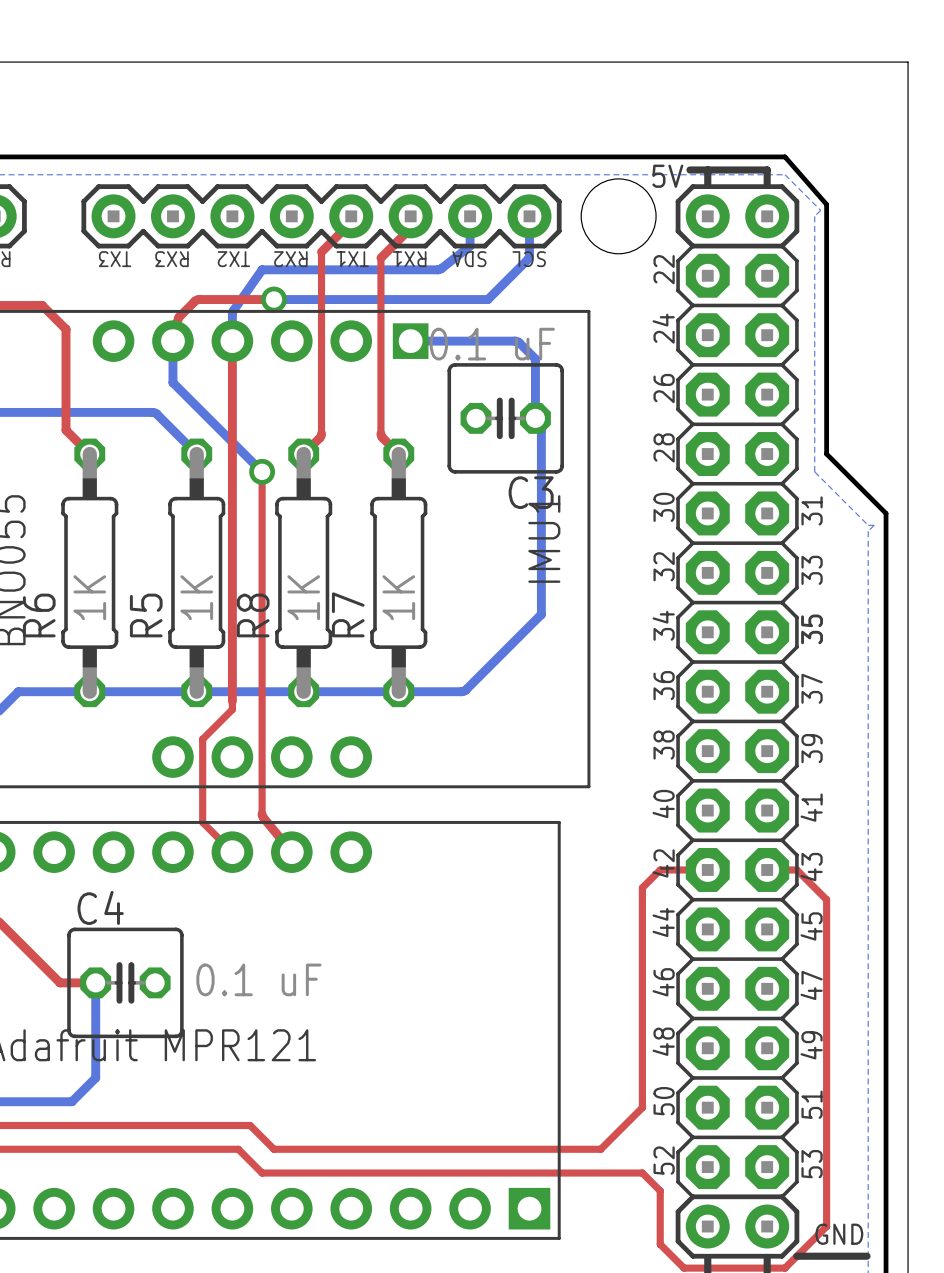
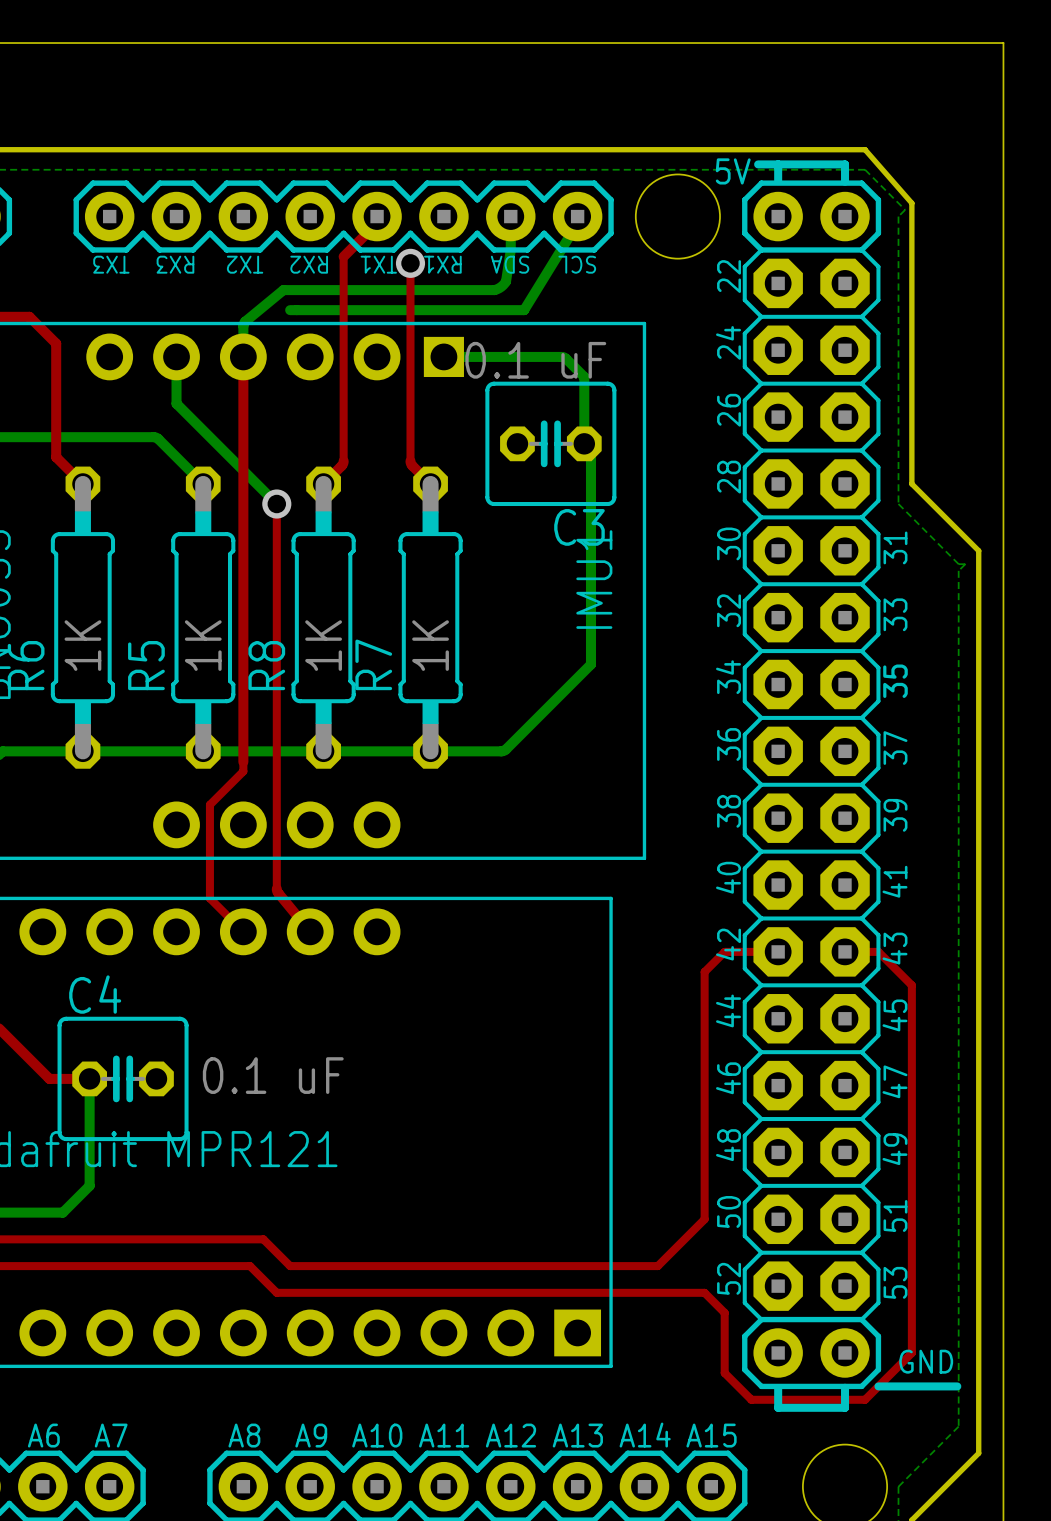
top track: (410, 216) (409, 229) (380, 257) -> none
bottom track: (529, 222) (528, 258) (487, 299) (481, 299) -> (577, 223) (524, 310)
bottom track: (470, 246) (438, 269) (262, 269) (234, 309) -> (510, 249) (506, 281) (494, 290) (283, 290) (245, 321)
top track: (273, 299) (196, 299) (178, 317) (171, 336) (172, 341) -> none
via position: (273, 299) -> (410, 263)

